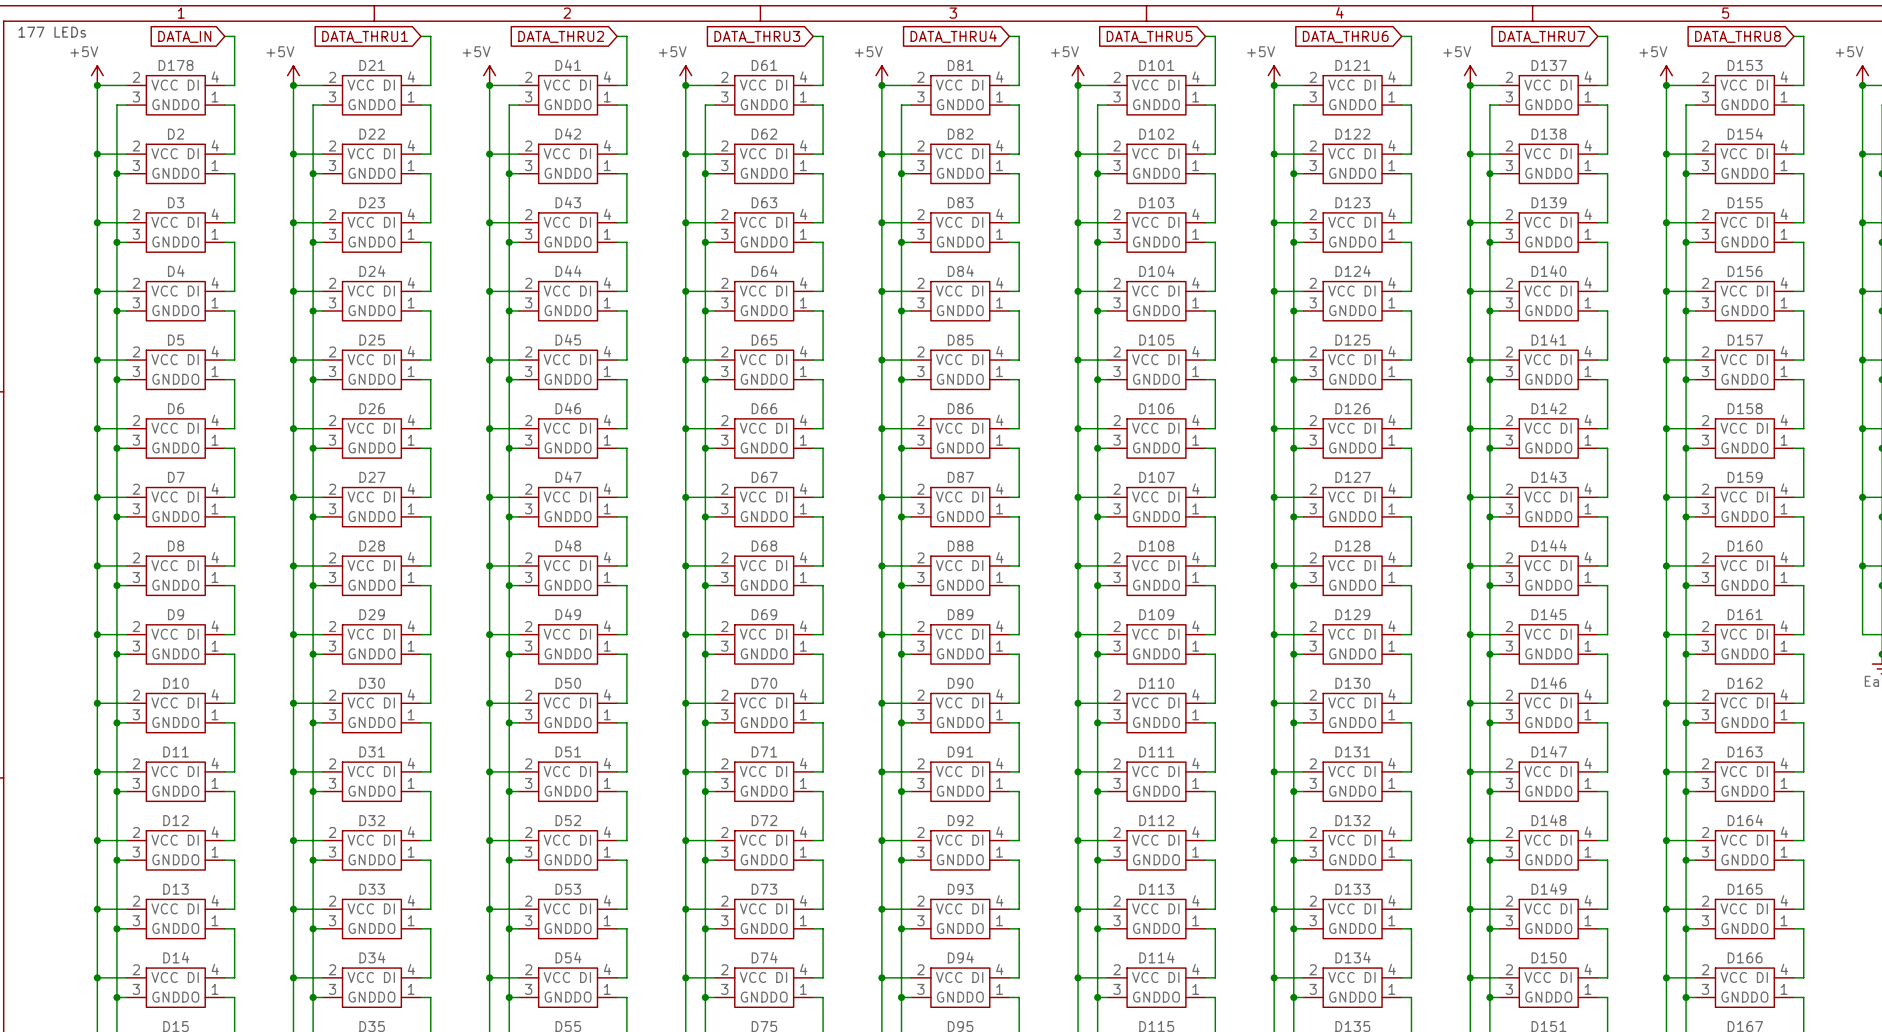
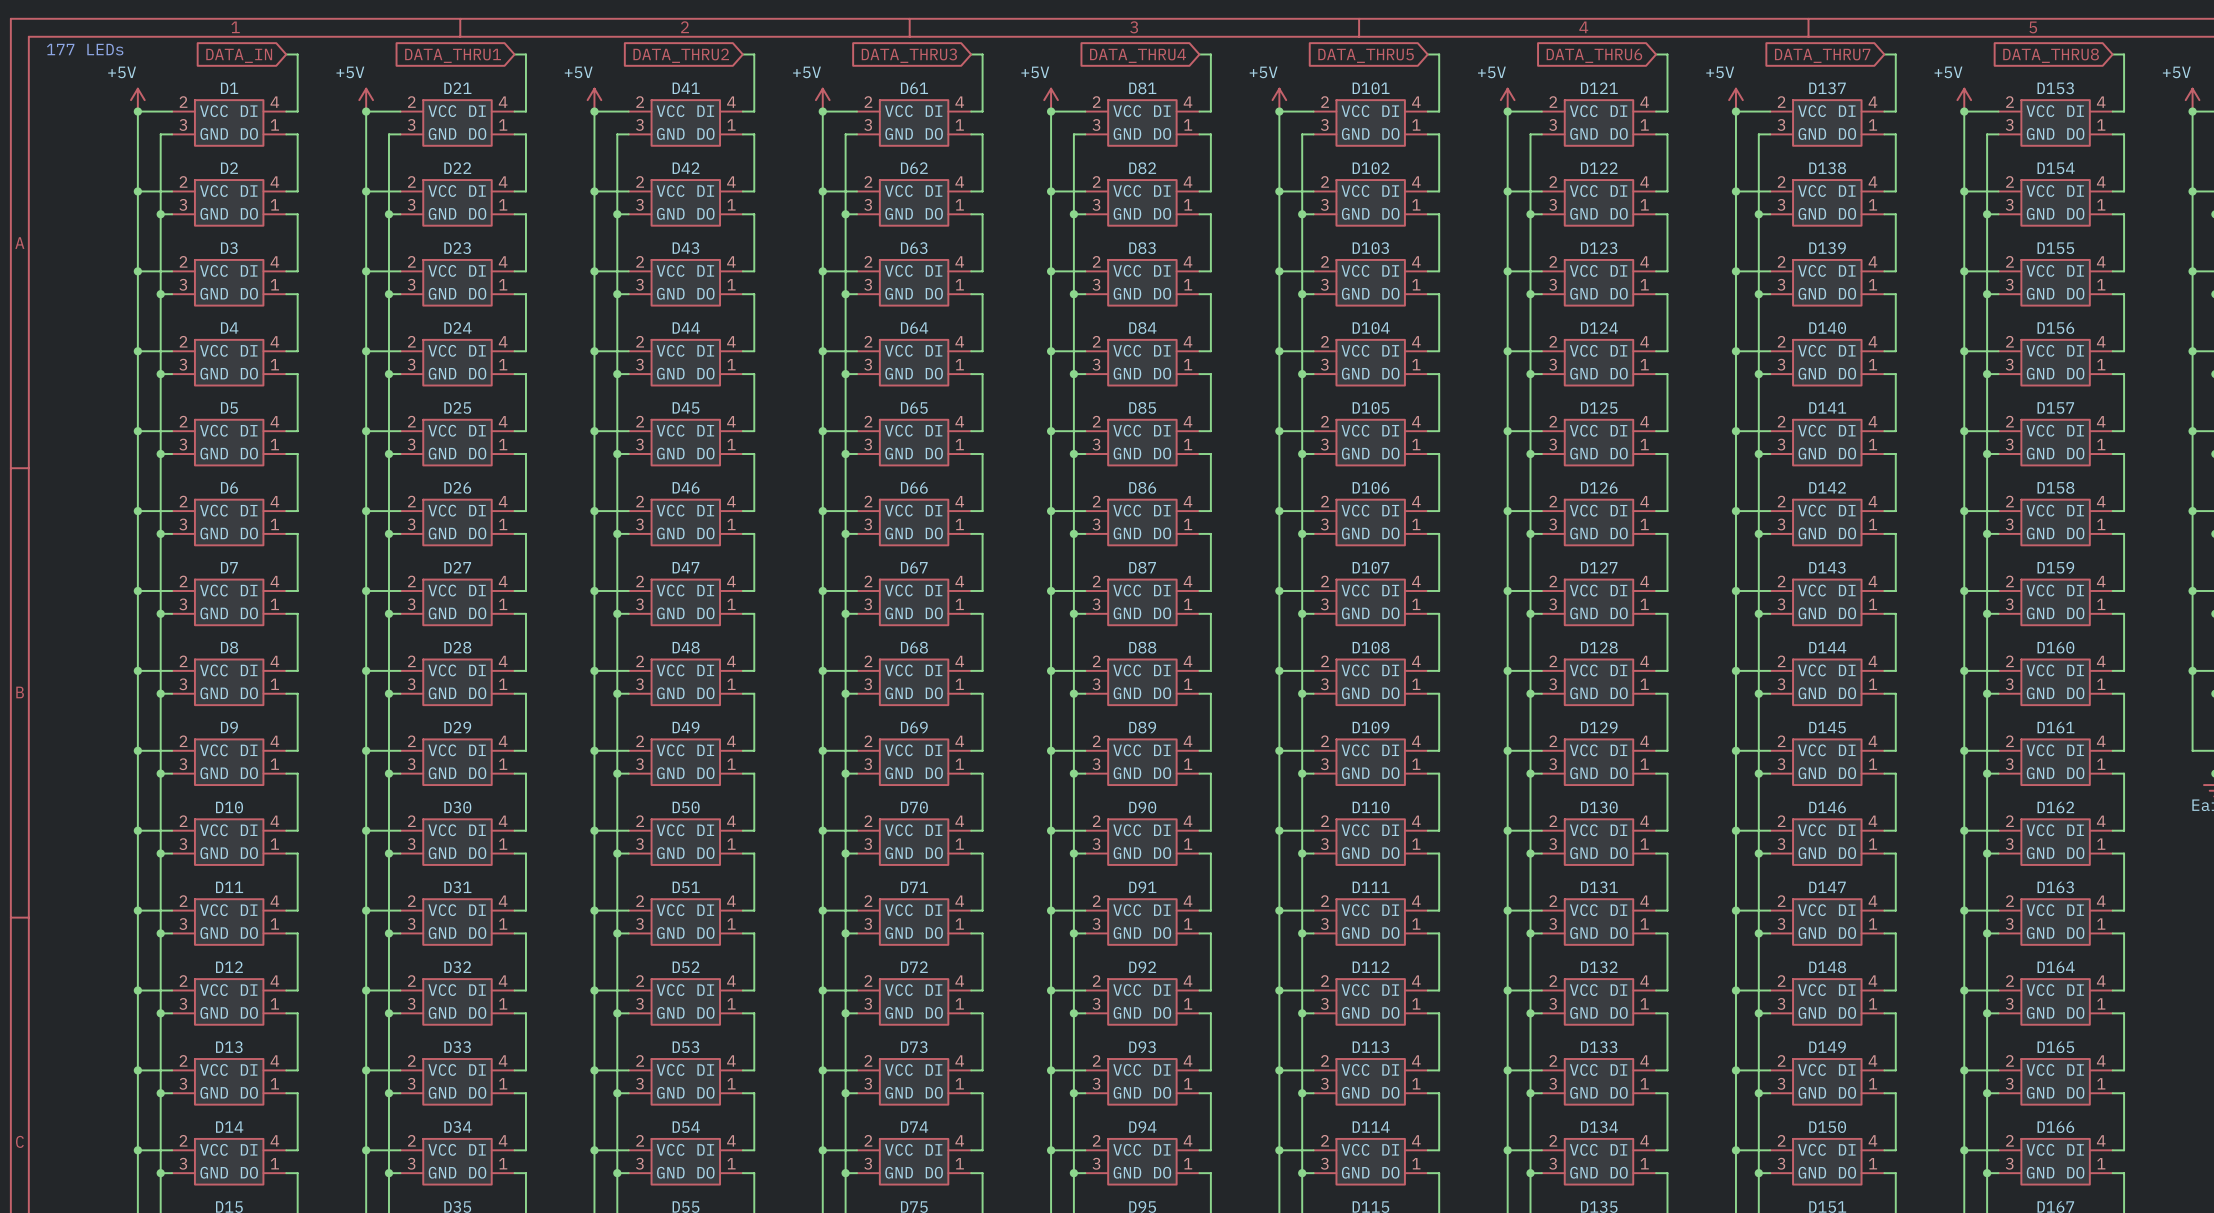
D178 name: D178 (176, 65) -> D1 (229, 88)

